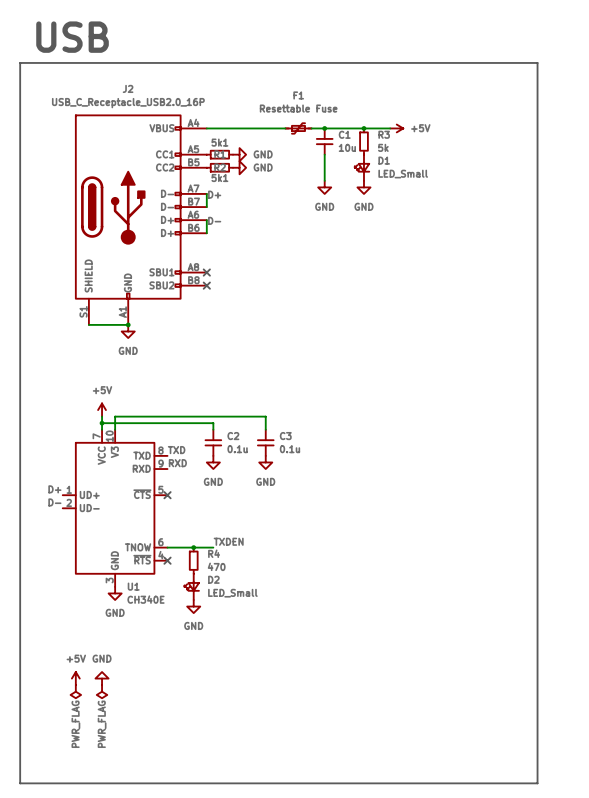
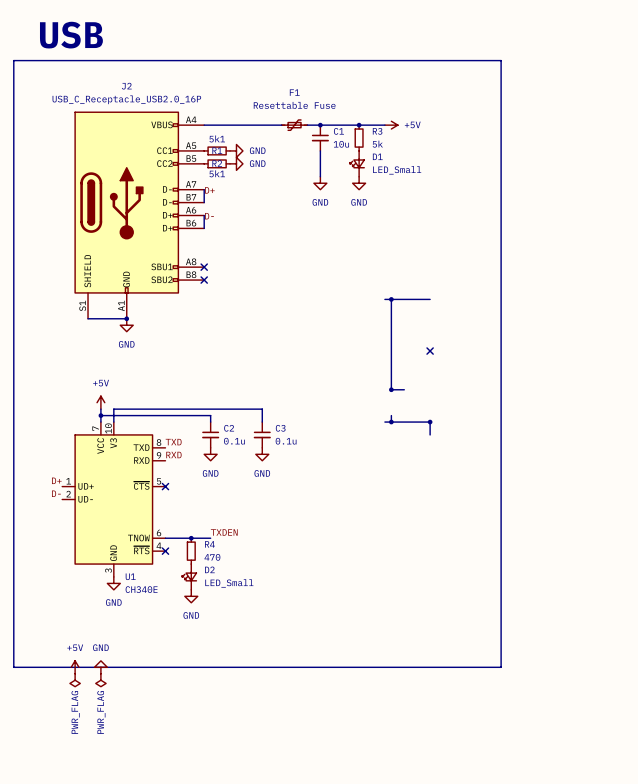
line: (20, 62) (20, 783) (537, 783) (537, 62) (508, 62) -> (20, 60) (13, 60) (13, 667) (501, 667) (501, 60)
wire: none -> (384, 299) (430, 299)
wire: none -> (391, 299) (391, 389) (404, 389)
junction: none -> (391, 299)
no-connect mark: none -> (430, 351)
junction: none -> (391, 389)
wire: none -> (391, 415) (391, 422)
wire: none -> (384, 422) (430, 422) (430, 434)
junction: none -> (391, 422)
junction: none -> (430, 422)

